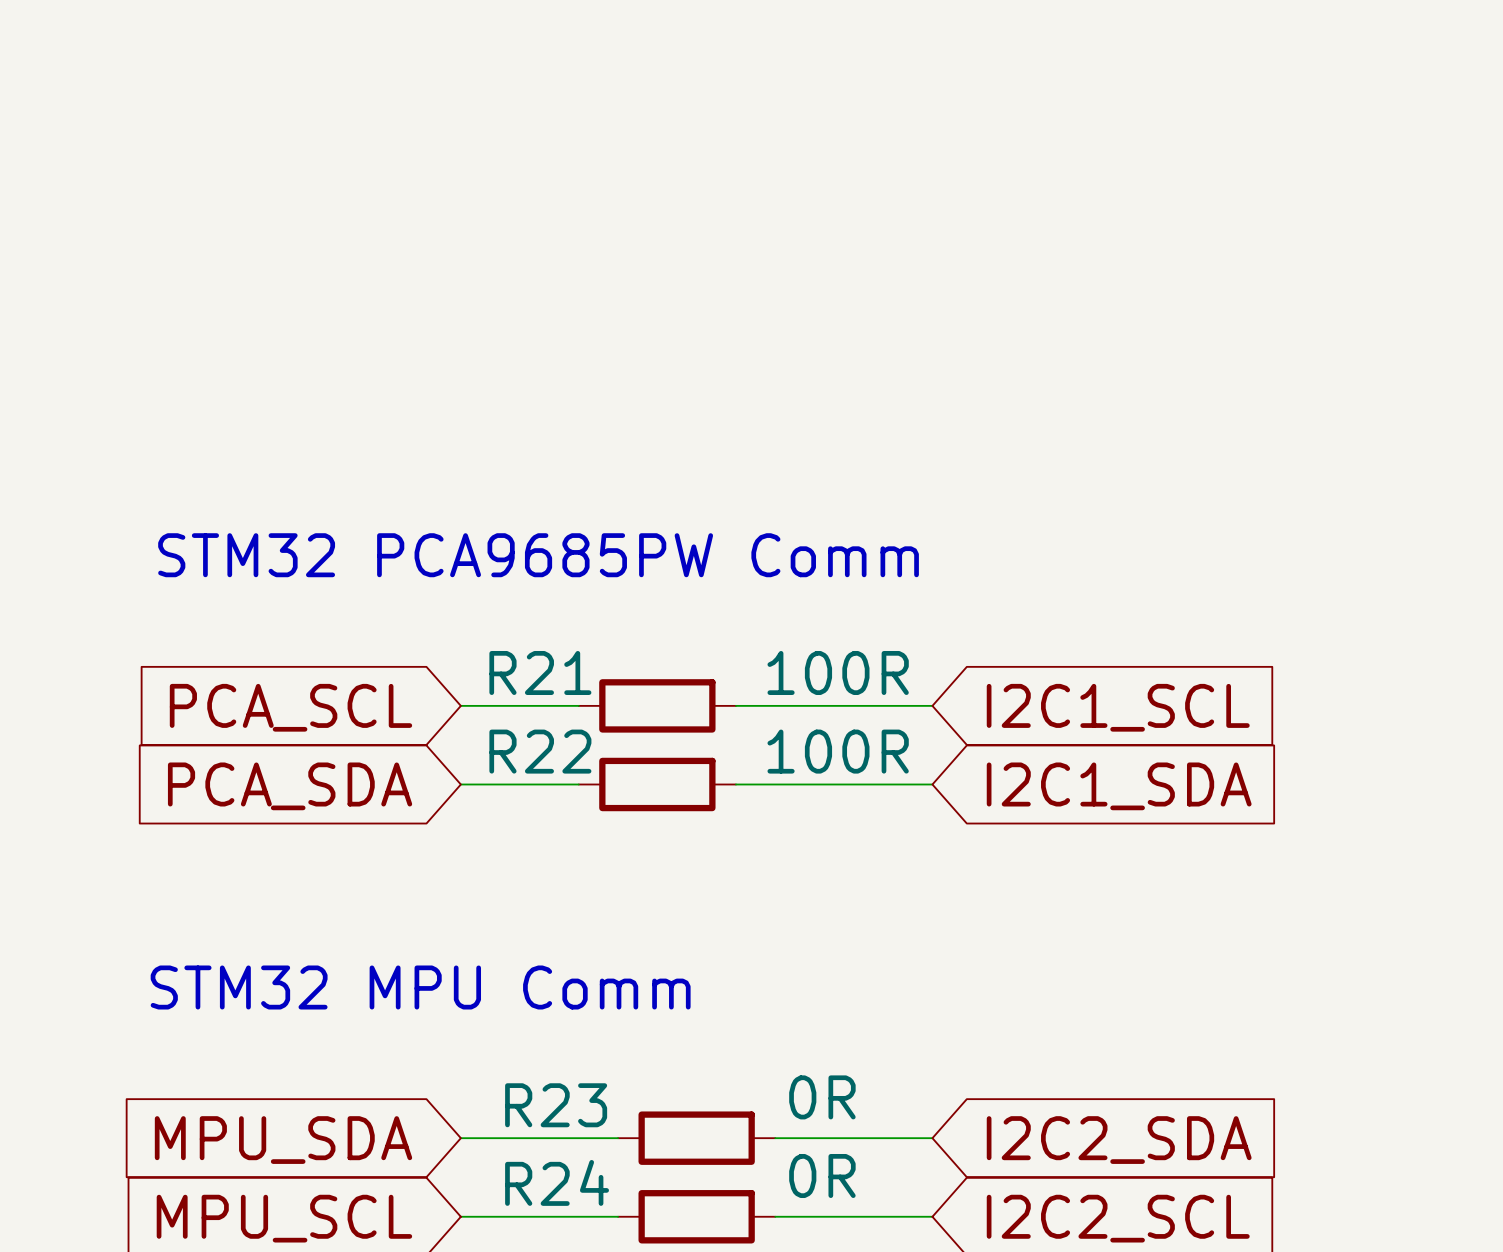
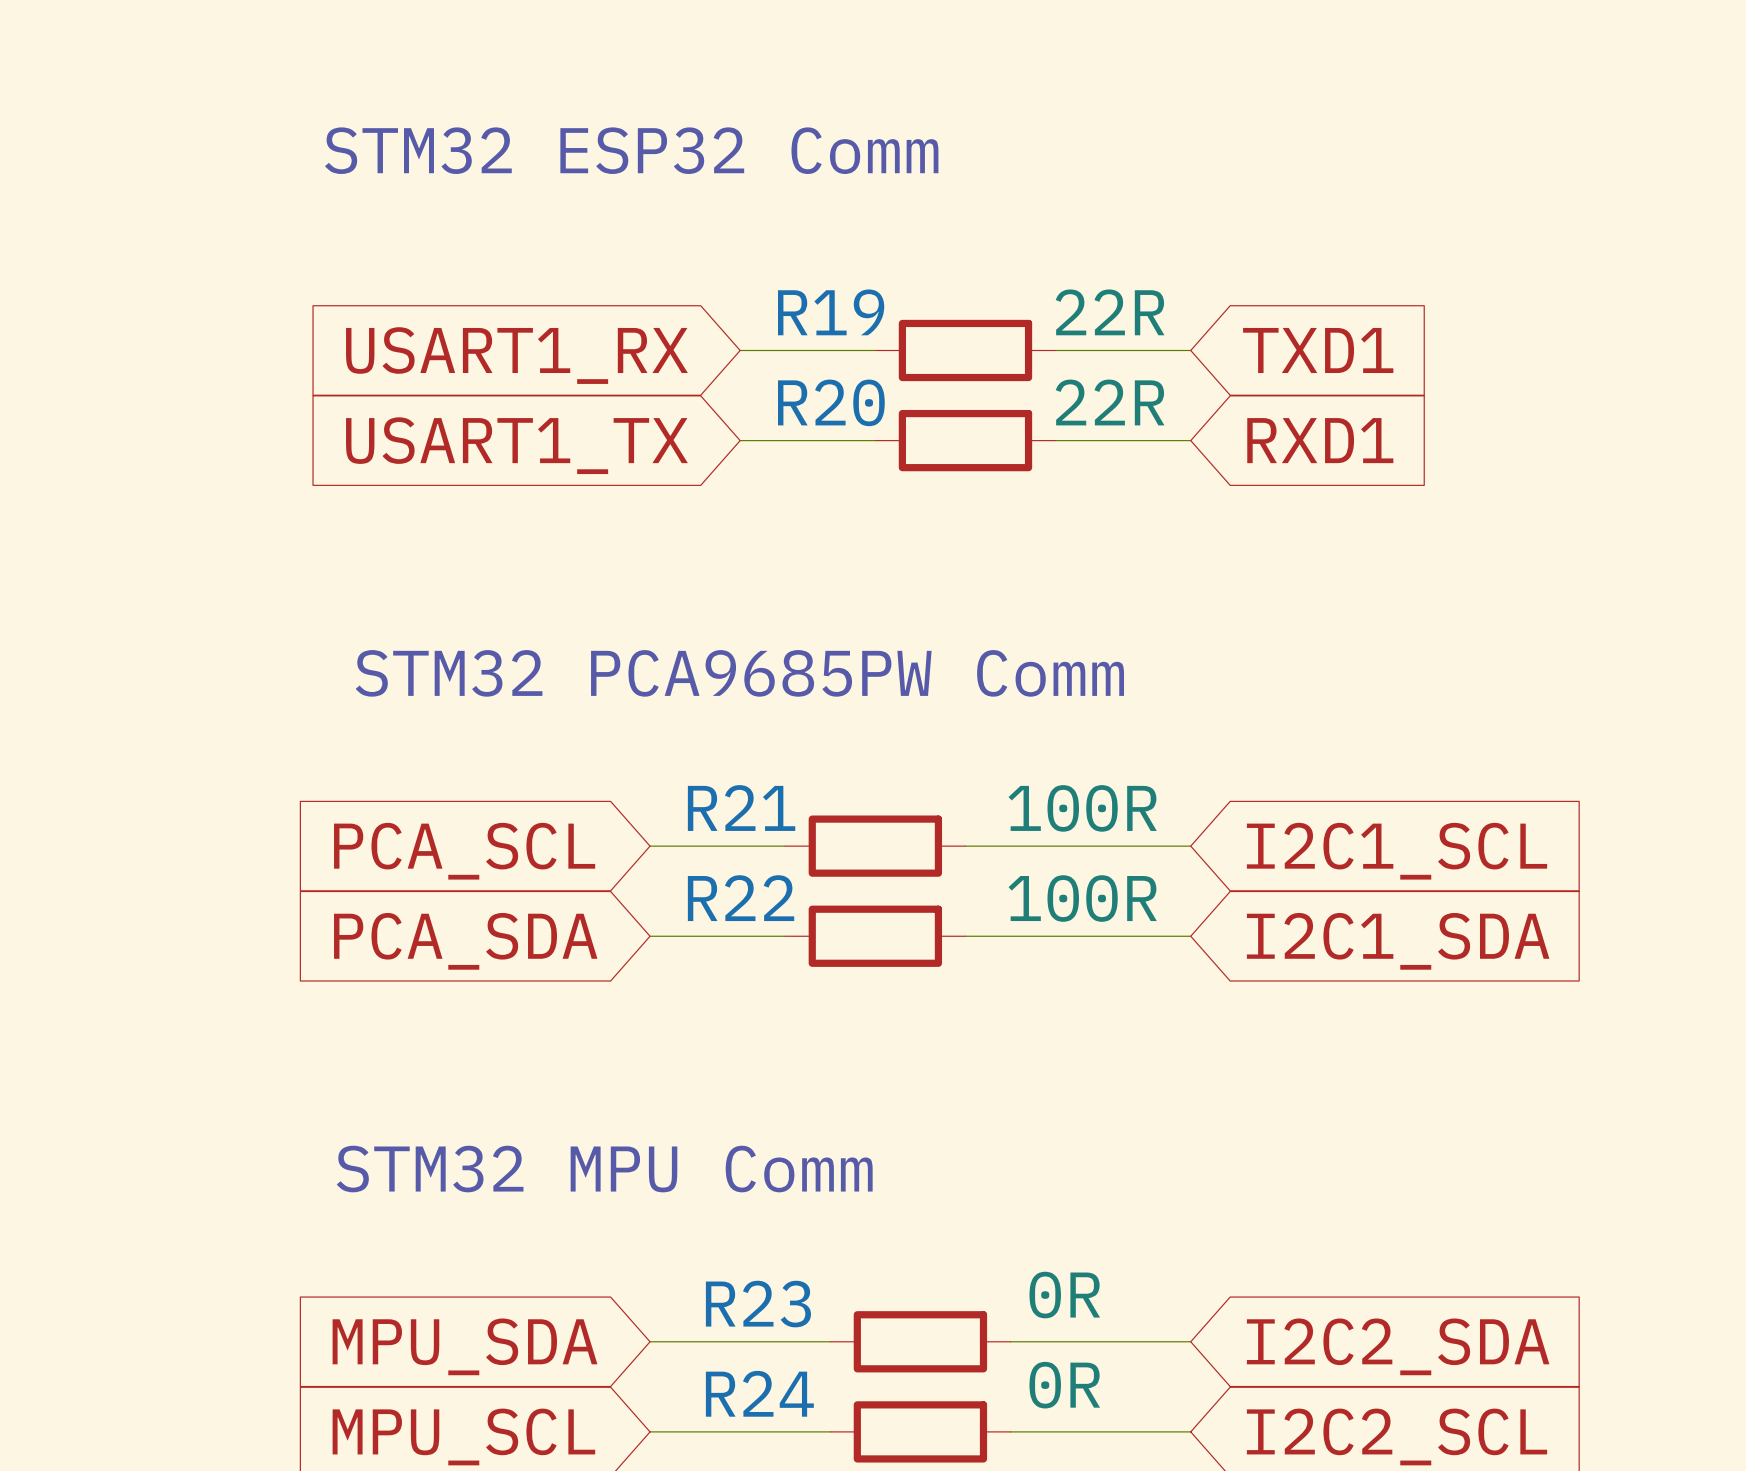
text: none -> STM32 ESP32 Comm (631, 150)
wire: none -> (740, 350) (875, 350)
R19: none -> 22R (965, 350)
wire: none -> (1055, 350) (1190, 350)
global label: none -> TXD1 (1318, 350)
global label: none -> USART1_RX (516, 355)
wire: none -> (740, 440) (875, 440)
R20: none -> 22R (965, 440)
wire: none -> (1055, 440) (1190, 440)
global label: none -> RXD1 (1320, 440)
global label: none -> USART1_TX (516, 445)

